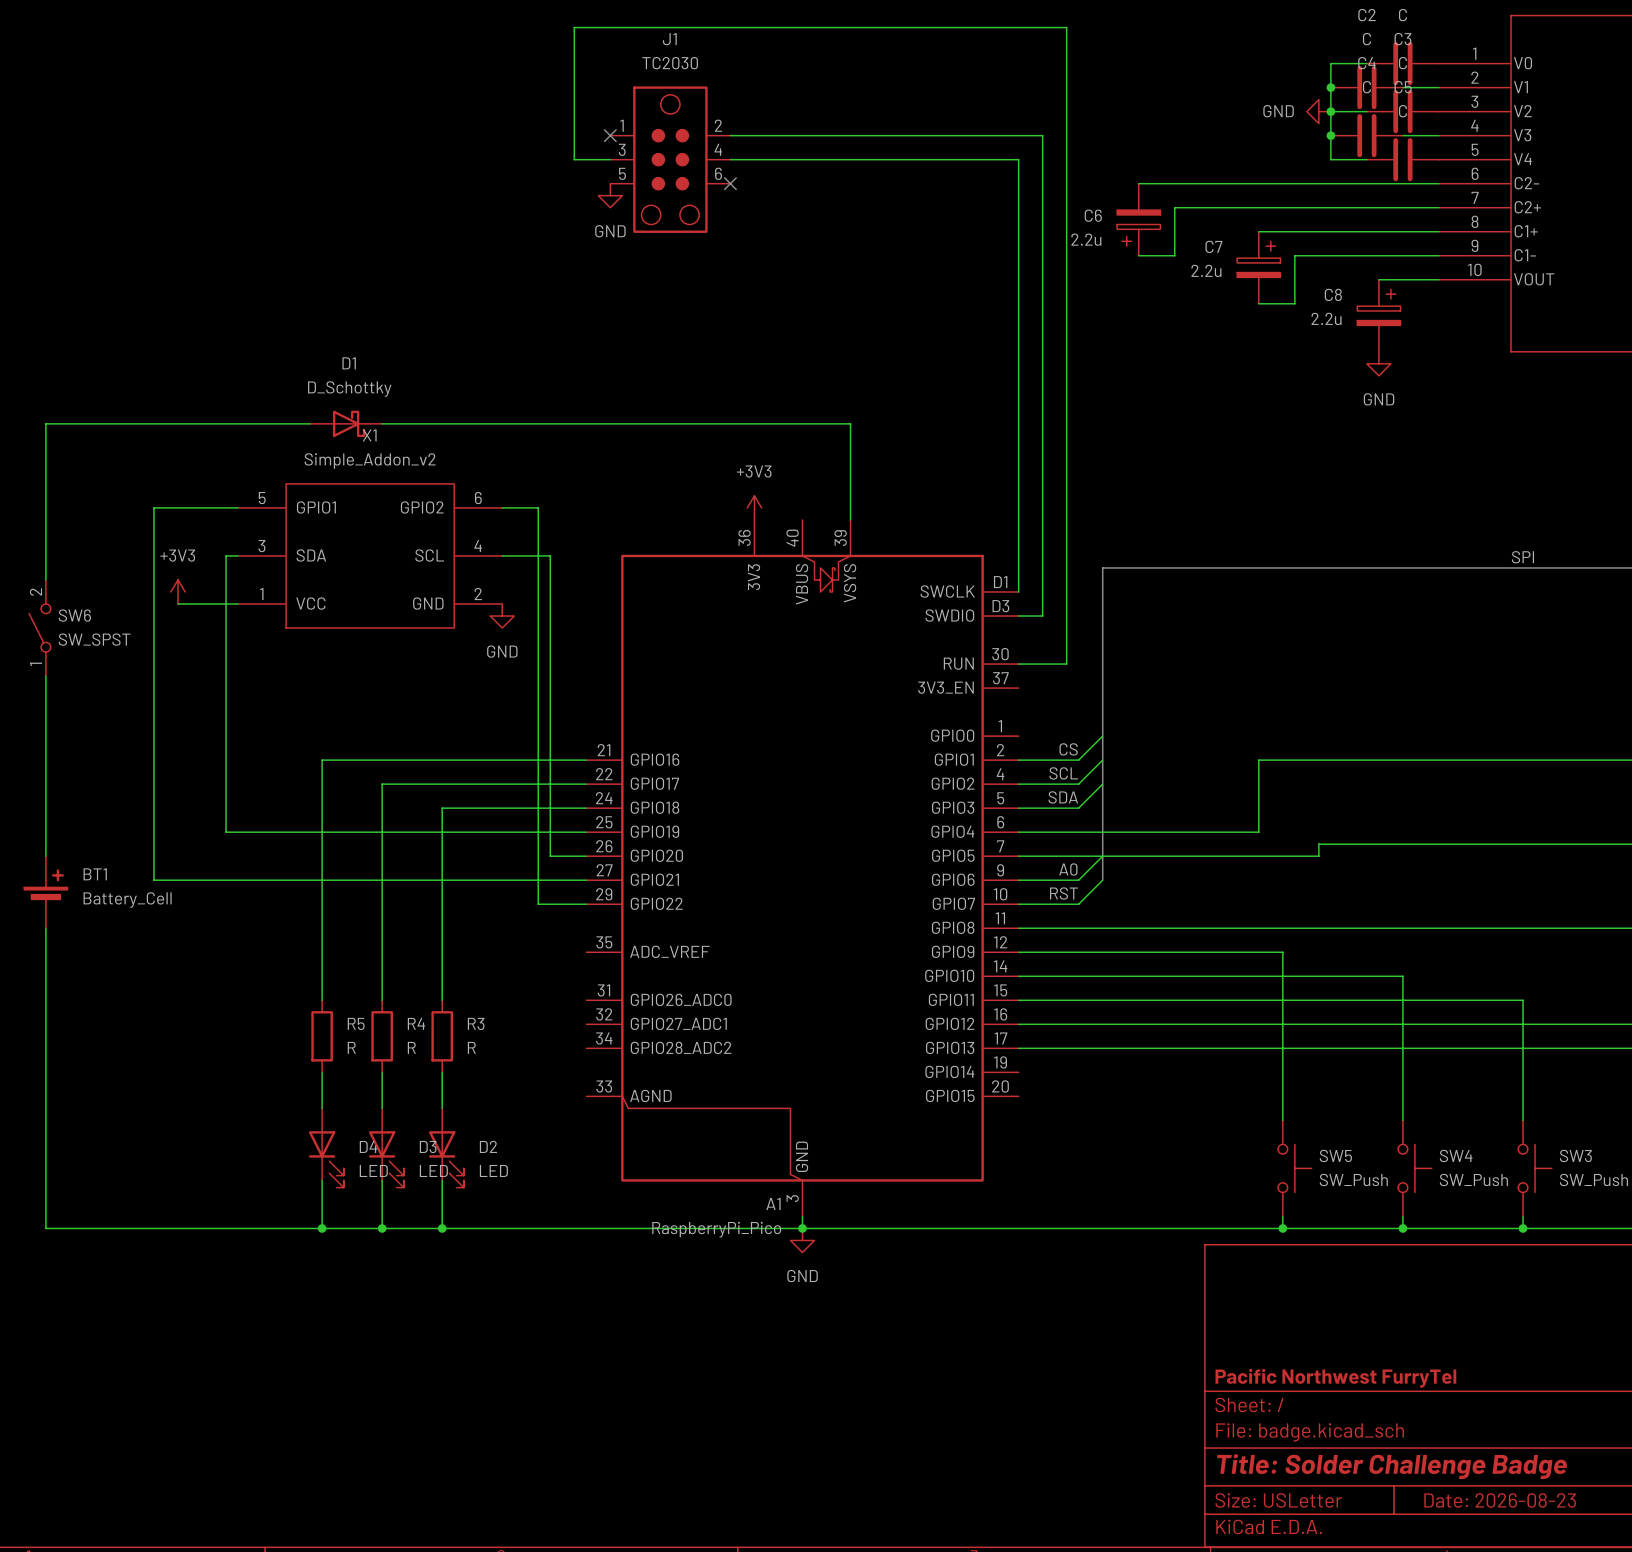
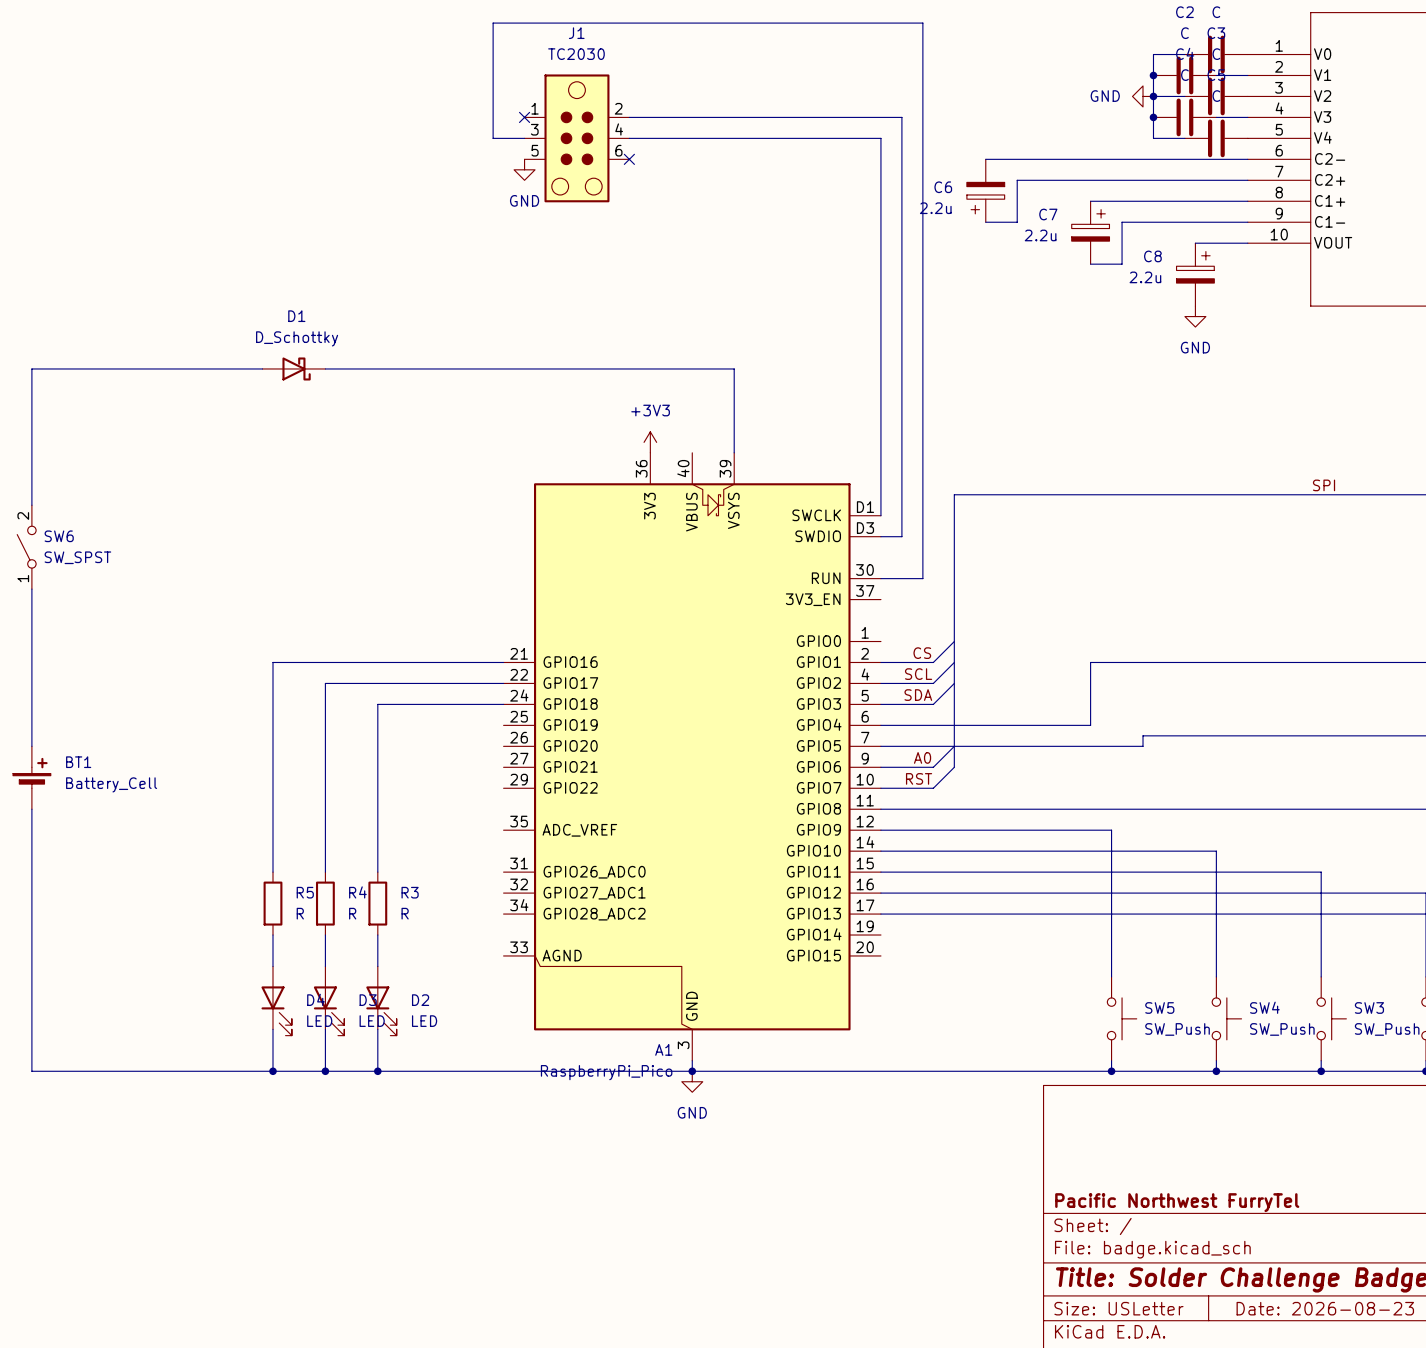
wire: (238, 507) (153, 507) (153, 880) (586, 880) -> none
wire: (502, 507) (538, 507) (538, 904) (586, 904) -> none
wire: (238, 555) (226, 555) (226, 832) (586, 832) -> none
X1: Simple_Addon_v2 (370, 555) -> none
wire: (502, 555) (550, 555) (550, 856) (586, 856) -> none
power symbol: +3V3 (178, 591) -> none
wire: (178, 604) (238, 604) -> none
power symbol: GND (502, 616) -> none

